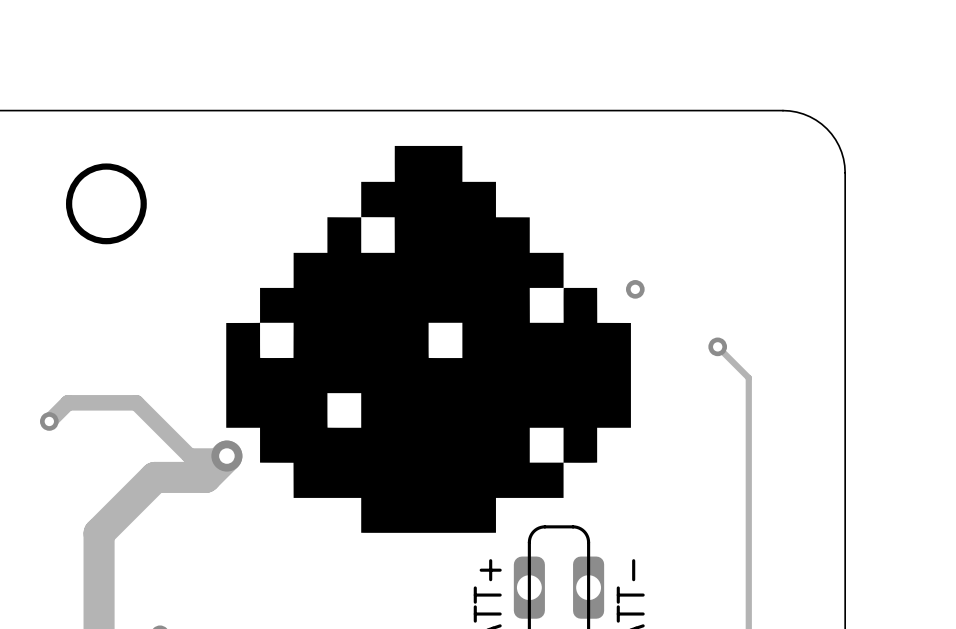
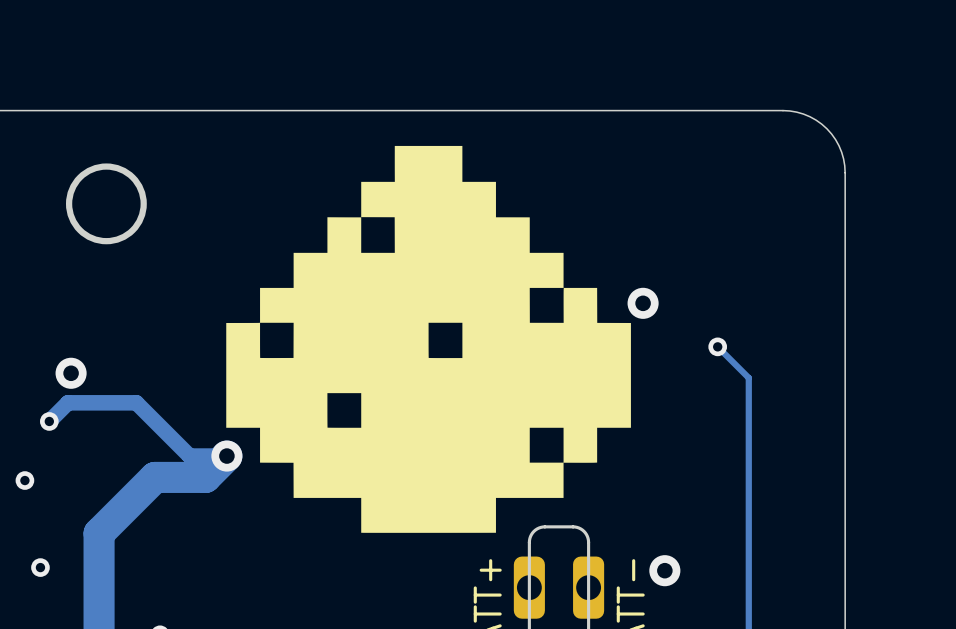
via size: [625, 280, 645, 299] -> [627, 287, 659, 319]
via: none -> (71, 373)
via: none -> (24, 480)
via: none -> (40, 567)
via: none -> (664, 570)

